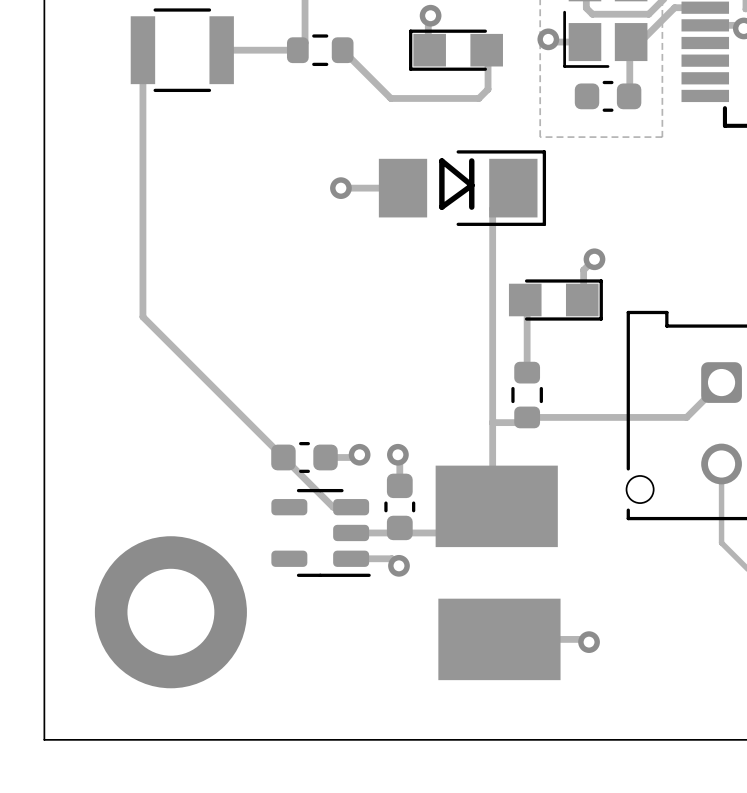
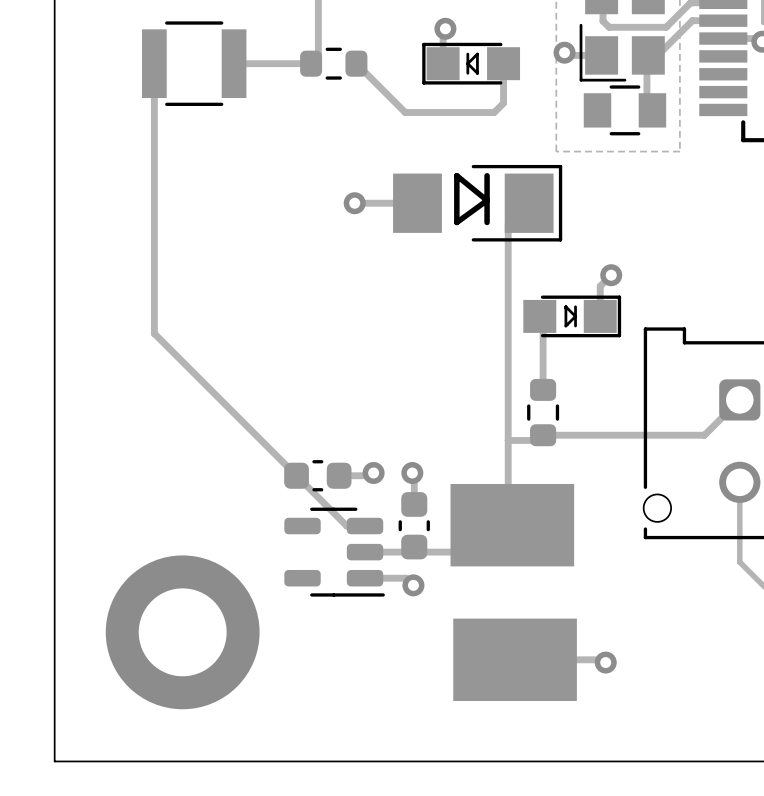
part footprint: [409, 29, 503, 71] -> [422, 42, 521, 85]
part footprint: [574, 80, 642, 112] -> [583, 85, 667, 136]
part footprint: [508, 279, 603, 321] -> [523, 295, 622, 338]

